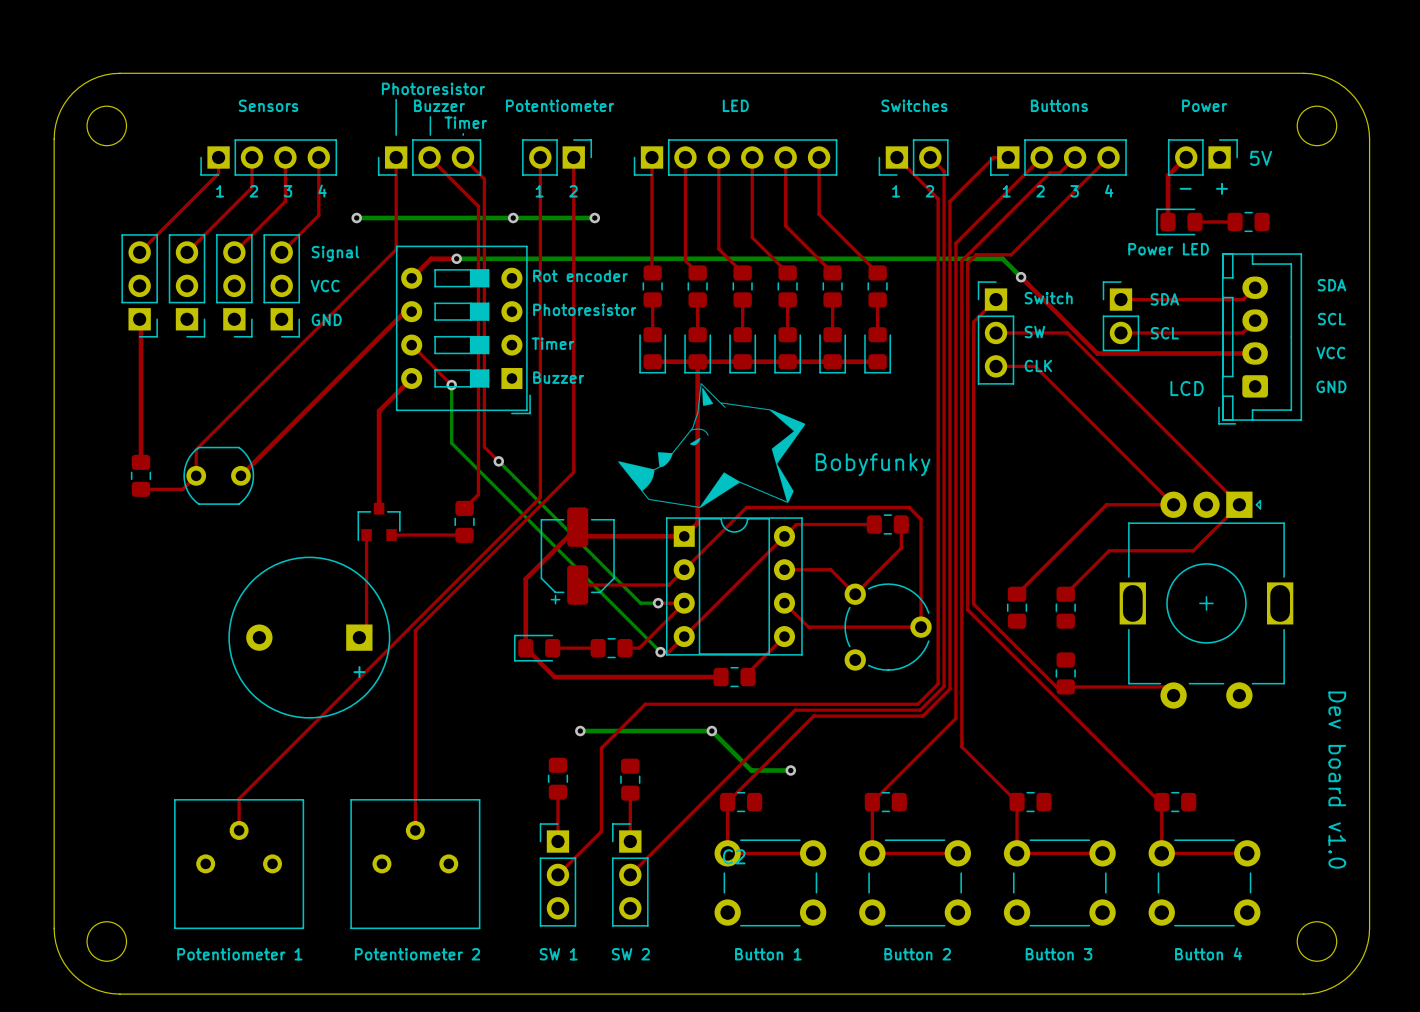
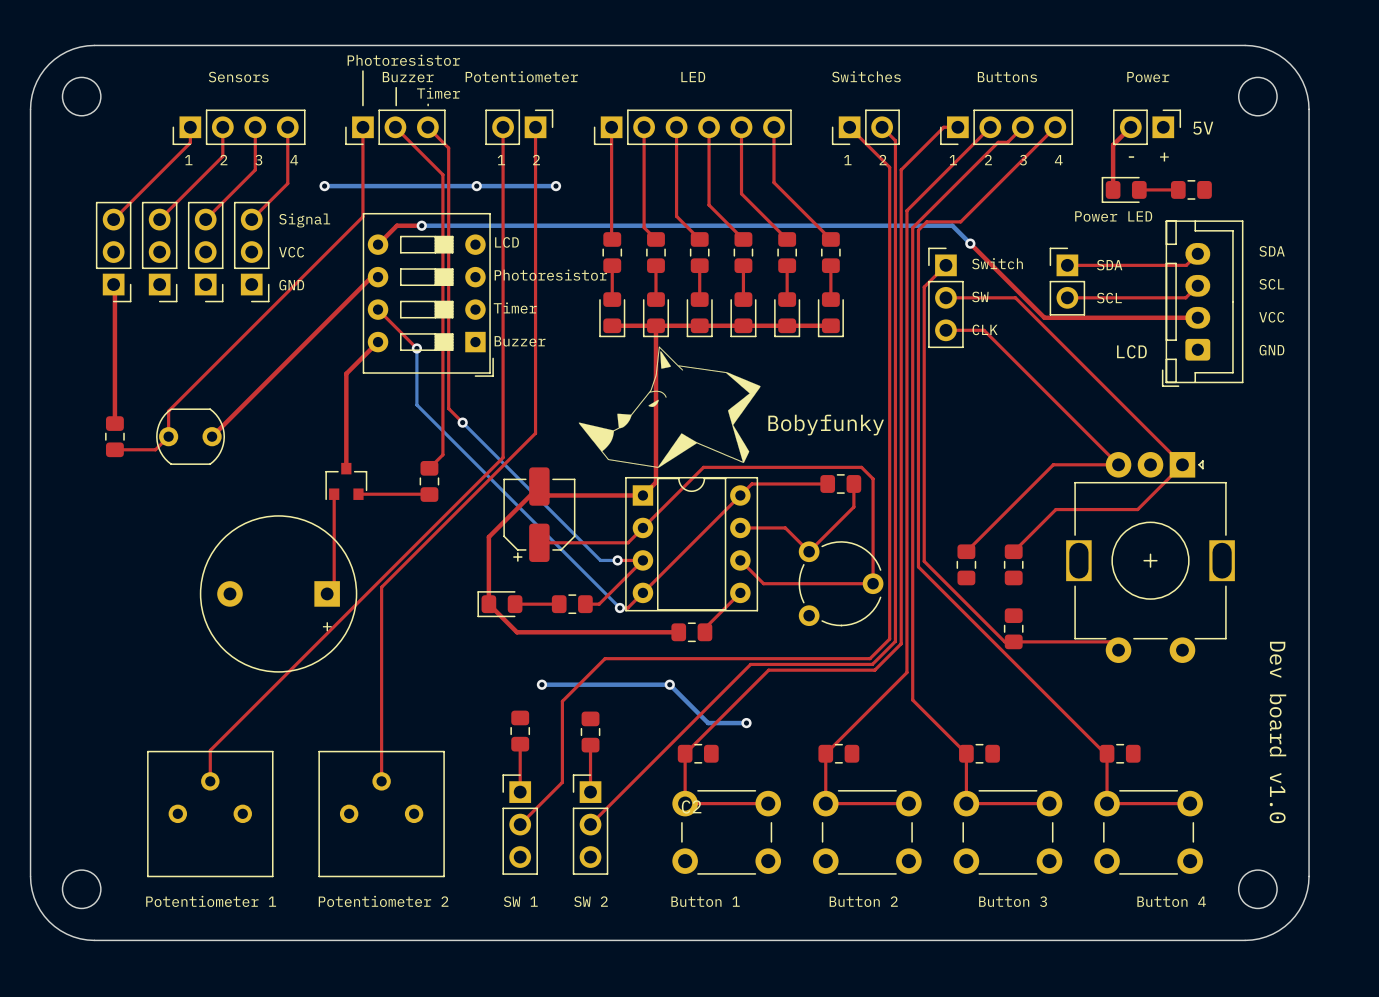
text: Rot encoder (580, 275) -> LCD (507, 242)

